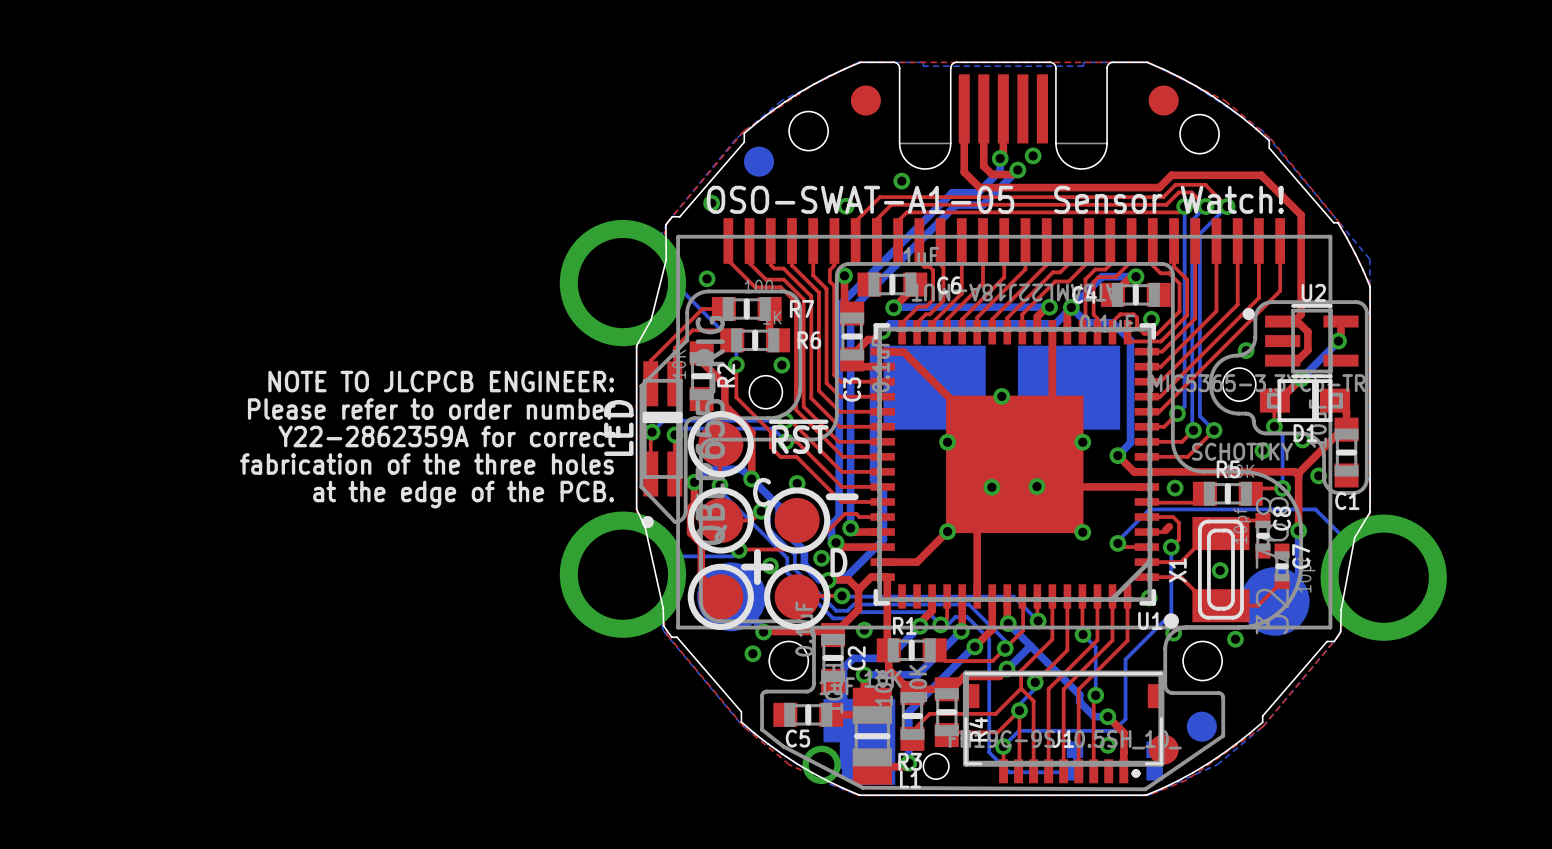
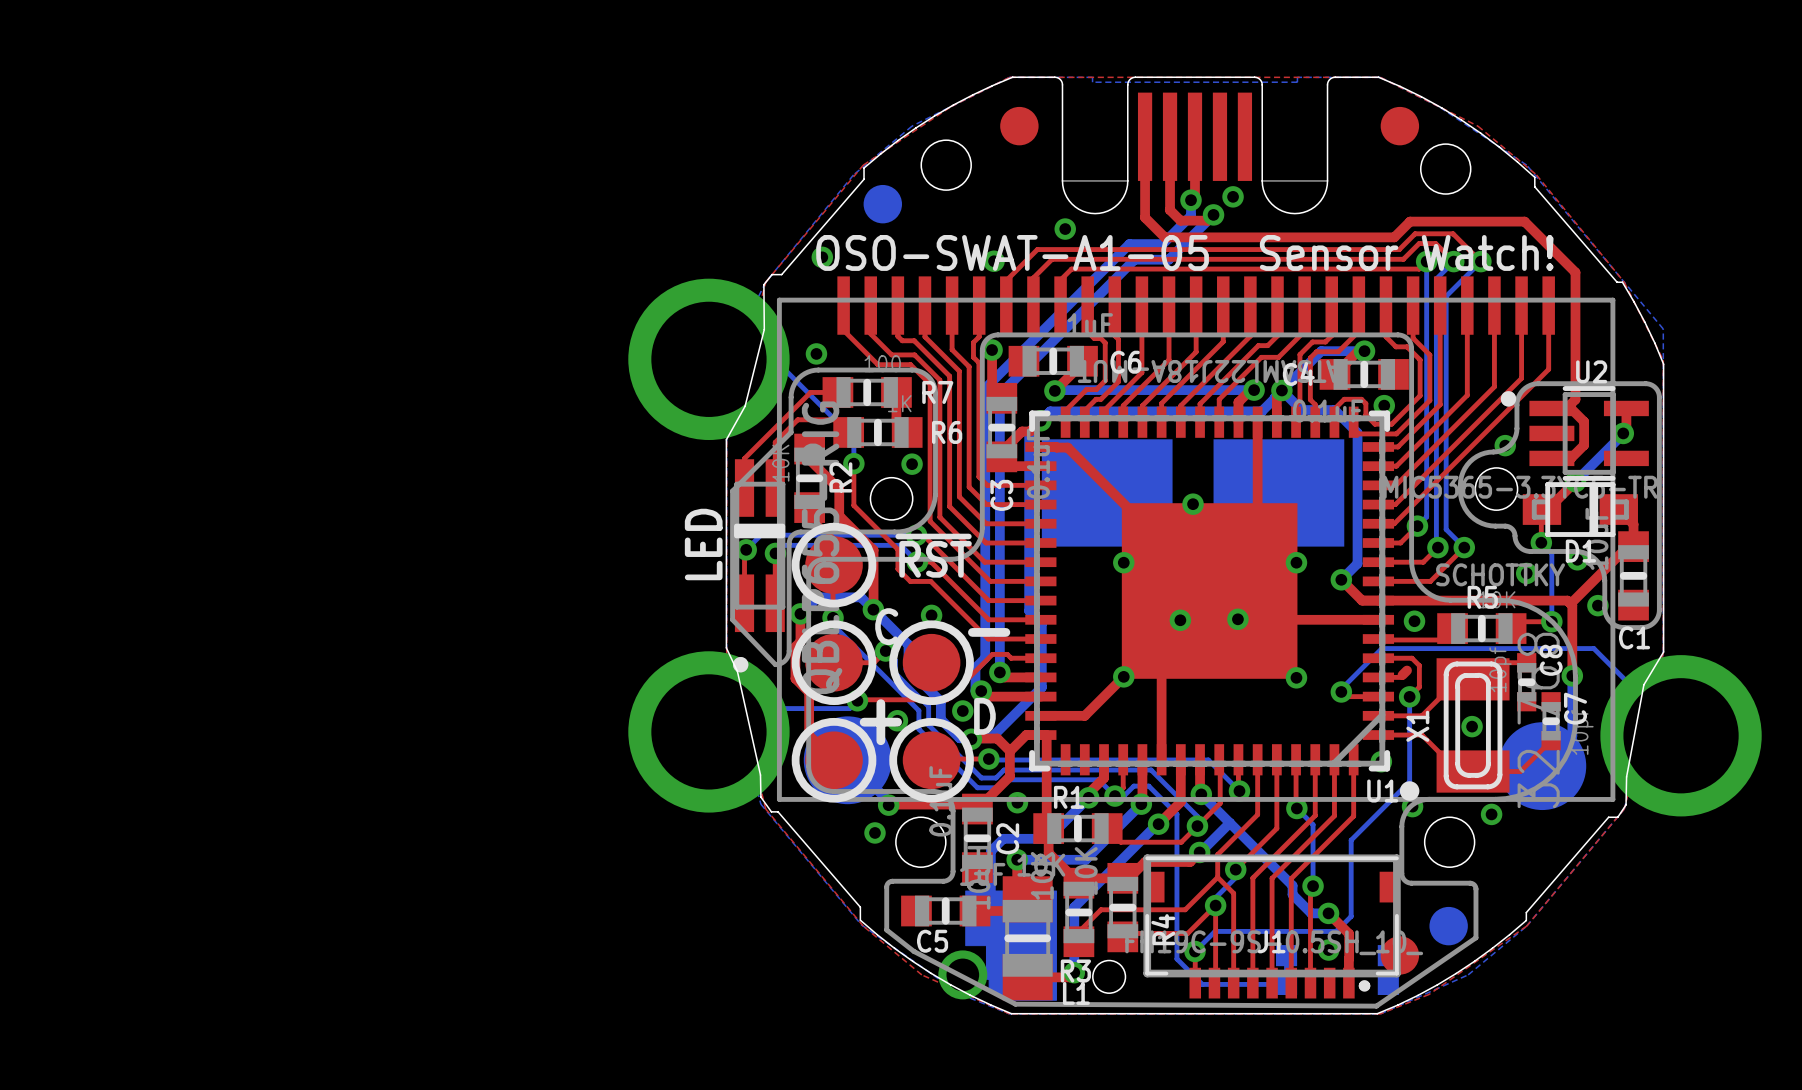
text: NOTE TO JLCPCB ENGINEER: (441, 381) -> none
text: Please refer to order number (431, 409) -> none
text: Y22-2862359A for correct (447, 436) -> none
text: fabrication of the three holes (427, 464) -> none
text: at the edge of the PCB. (463, 494) -> none

